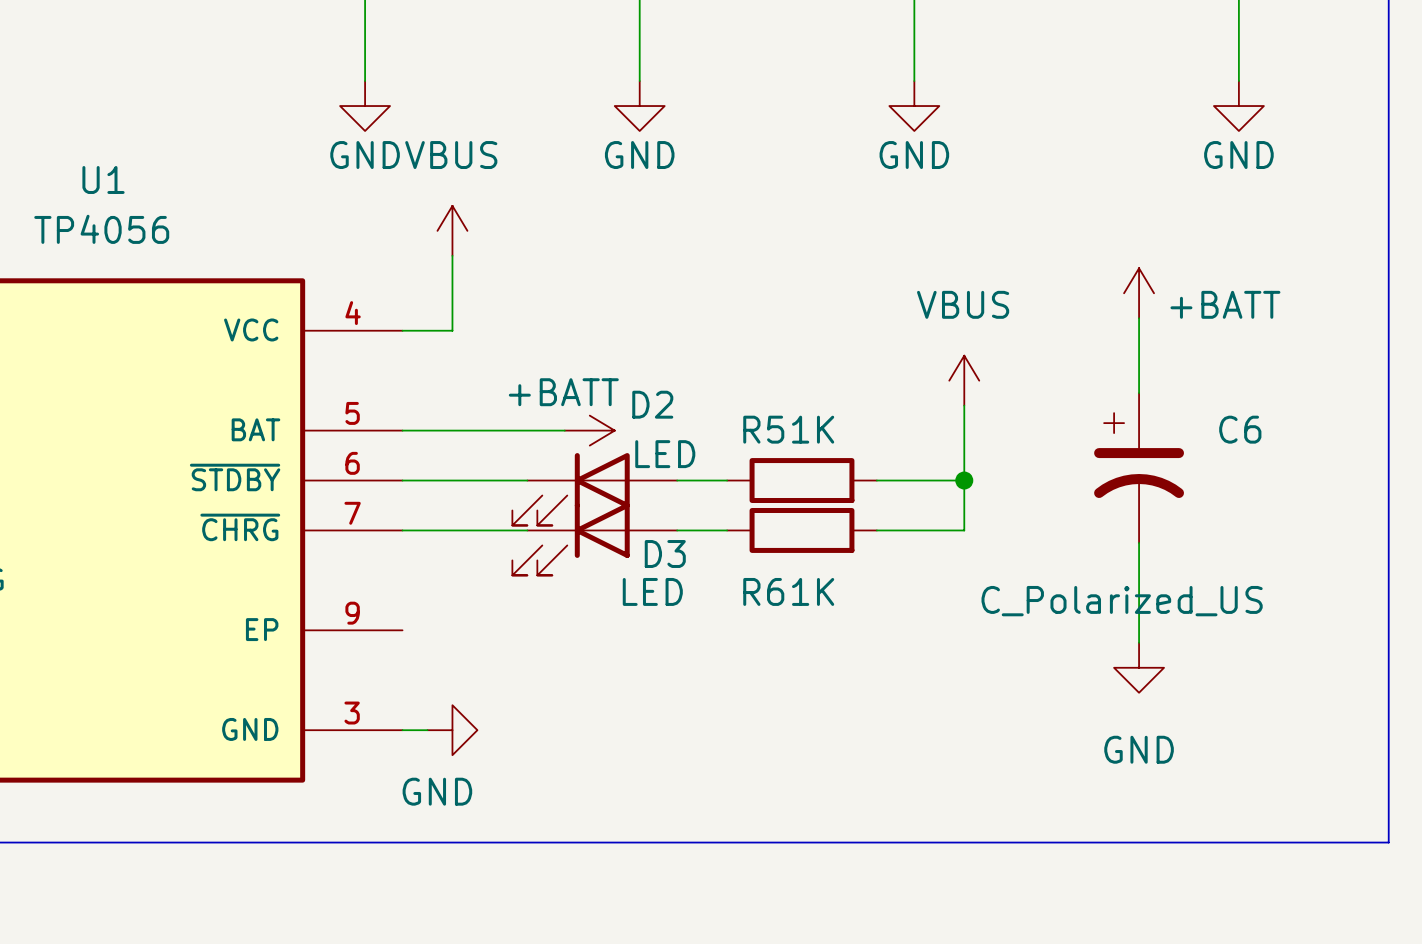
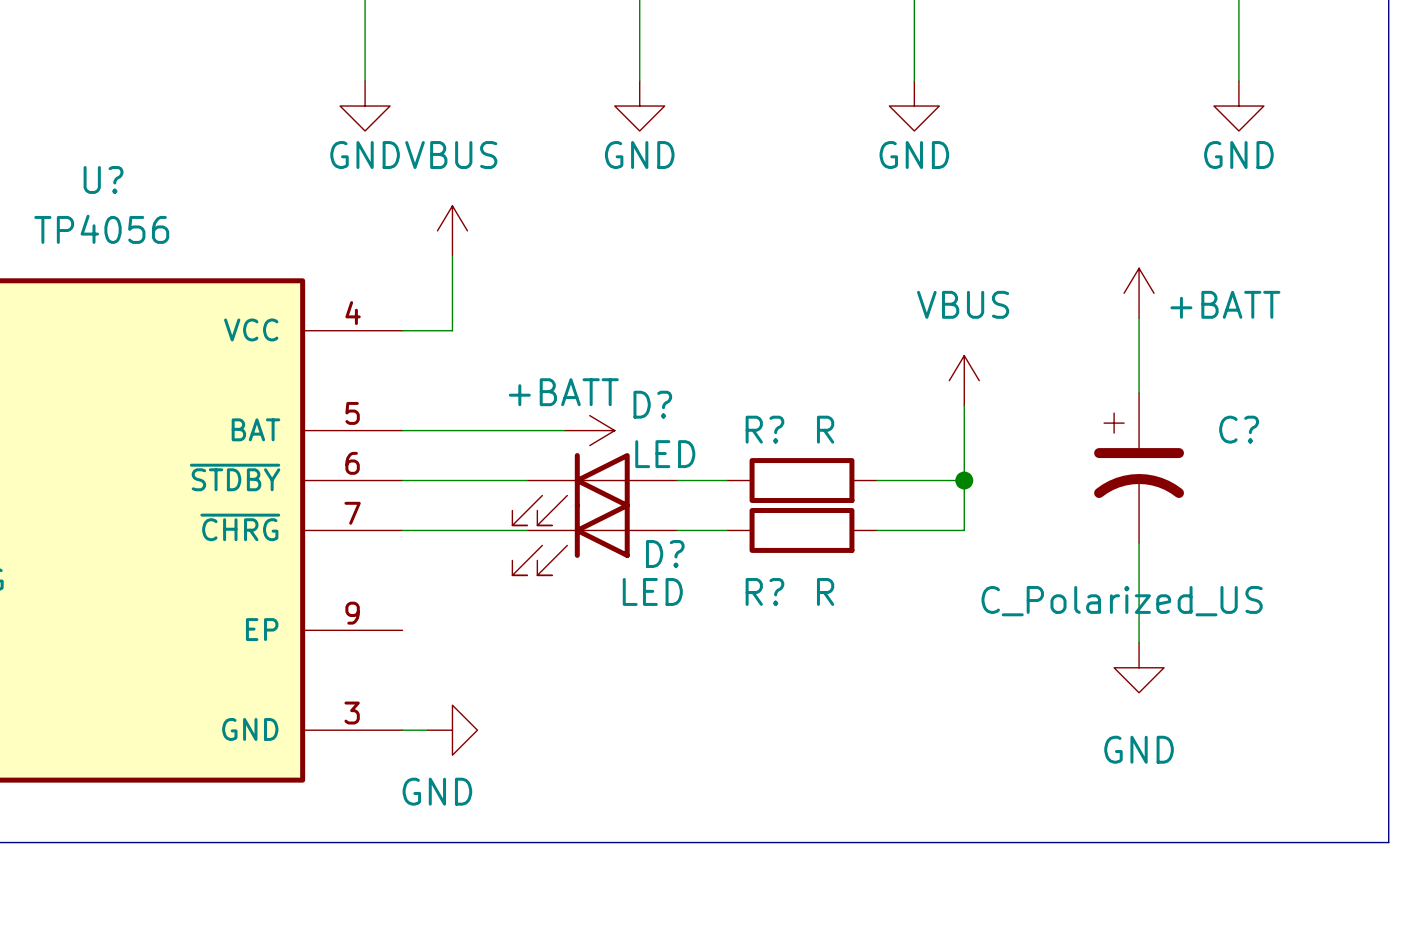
U1 name: U1 (103, 179) -> U? (103, 179)
D2 name: D2 (652, 404) -> D? (652, 404)
R5 name: R5 (763, 429) -> R? (764, 429)
R5 value: 1K (813, 429) -> R (825, 429)
C6 name: C6 (1240, 429) -> C? (1239, 429)
D3 name: D3 (665, 554) -> D? (665, 554)
R6 name: R6 (763, 591) -> R? (764, 591)
R6 value: 1K (813, 591) -> R (825, 591)

